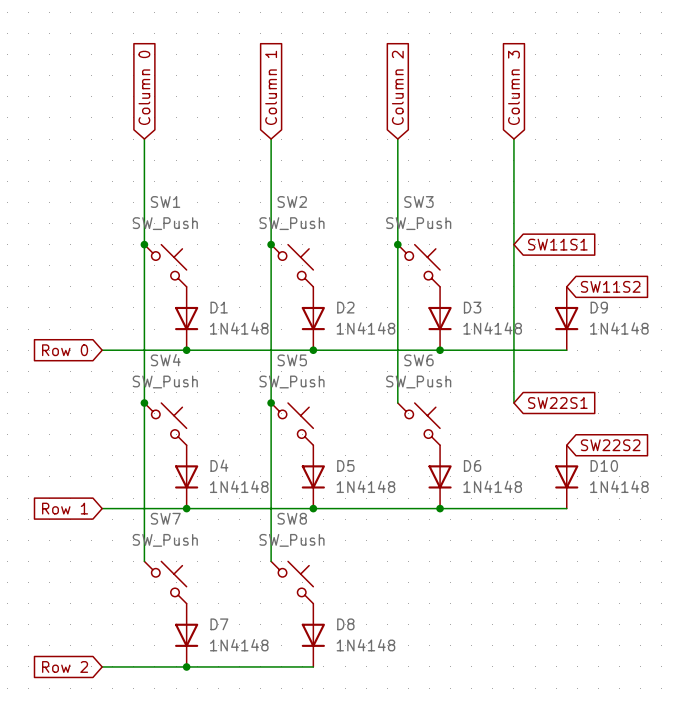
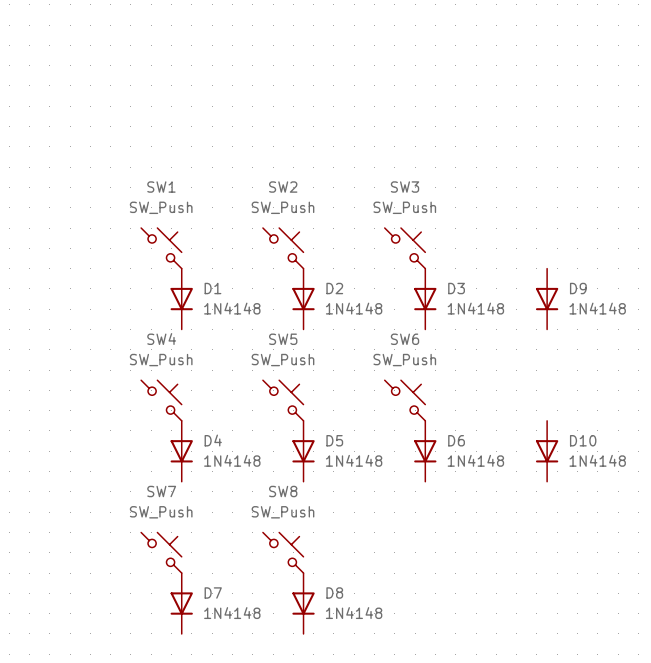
global label: Column 0 (144, 87) -> none
global label: Column 1 (271, 87) -> none
global label: Column 2 (397, 87) -> none
global label: Column 3 (513, 87) -> none
wire: (144, 139) (144, 561) -> none
wire: (271, 139) (271, 561) -> none
wire: (397, 139) (397, 403) -> none
wire: (513, 139) (513, 403) -> none
junction: (144, 244) -> none
junction: (271, 244) -> none
junction: (397, 244) -> none
global label: SW11S1 (557, 244) -> none
global label: SW11S2 (610, 286) -> none
global label: Row 0 (65, 350) -> none
wire: (102, 350) (566, 350) -> none
junction: (186, 350) -> none
junction: (313, 350) -> none
junction: (440, 350) -> none
junction: (144, 403) -> none
junction: (271, 403) -> none
global label: SW22S1 (557, 403) -> none
global label: SW22S2 (610, 445) -> none
global label: Row 1 (65, 508) -> none
wire: (102, 508) (566, 508) -> none
junction: (186, 508) -> none
junction: (313, 508) -> none
junction: (440, 508) -> none
global label: Row 2 (65, 666) -> none
wire: (102, 666) (313, 666) -> none
junction: (186, 666) -> none

